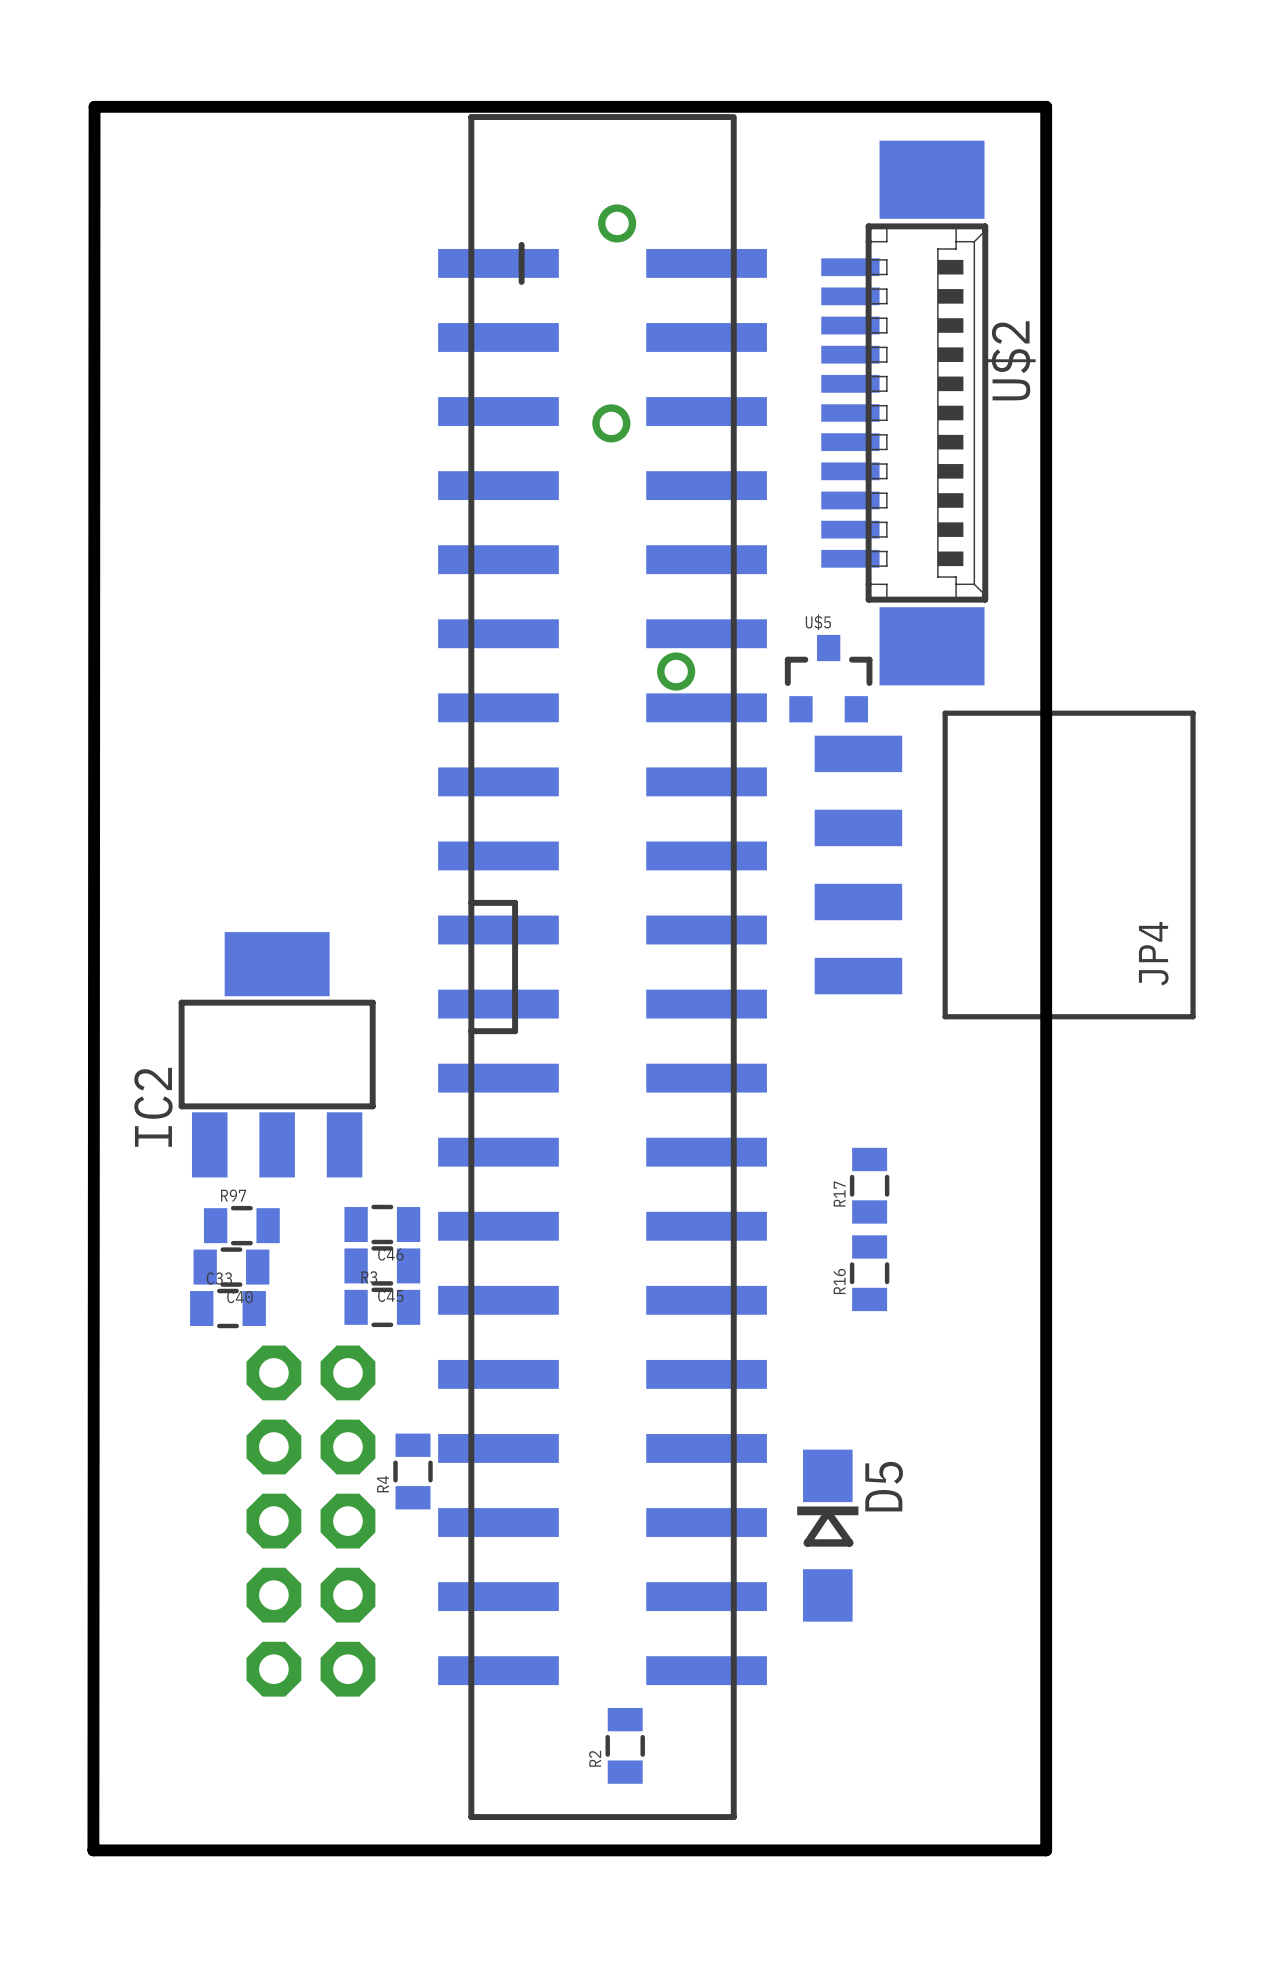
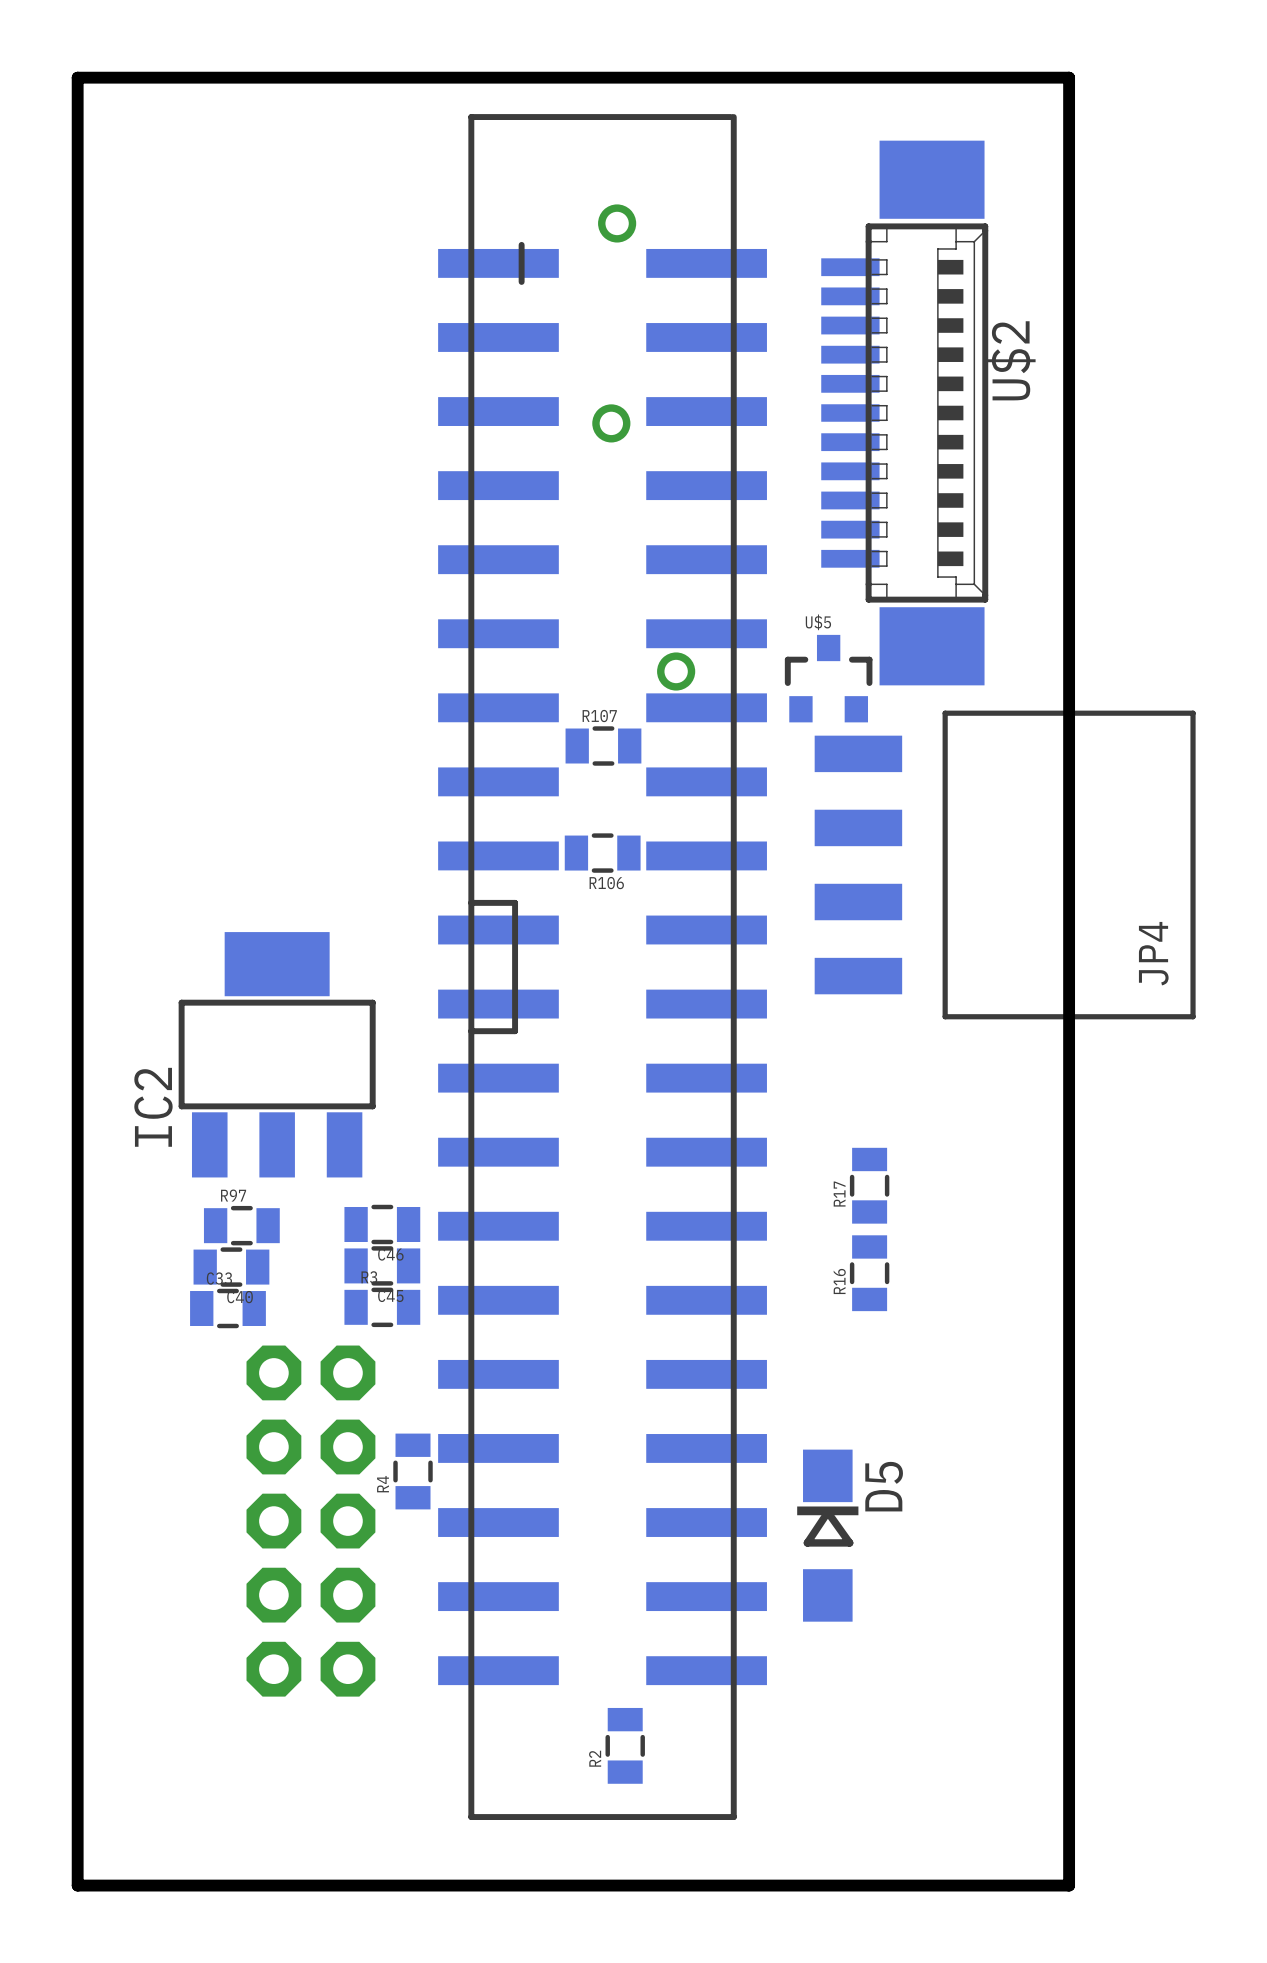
board edge: (1046, 106) (1046, 1850) (93, 1850) (94, 106) (1046, 106) -> (1069, 77) (1069, 1885) (77, 1885) (77, 77) (1069, 77)
R107: none -> (603, 746)
R106: none -> (602, 853)

